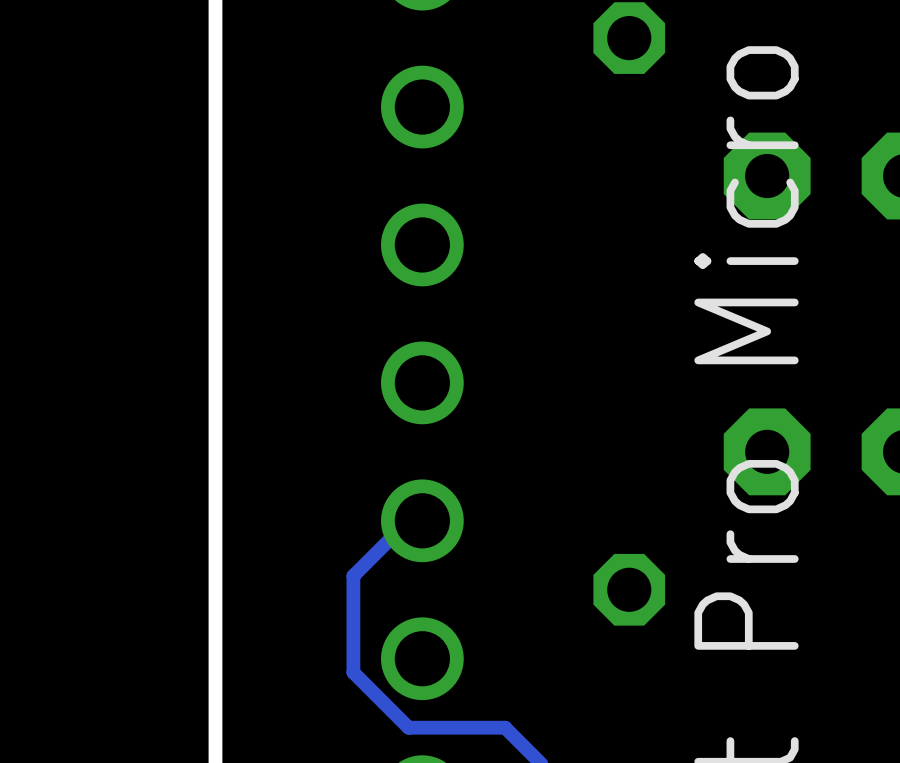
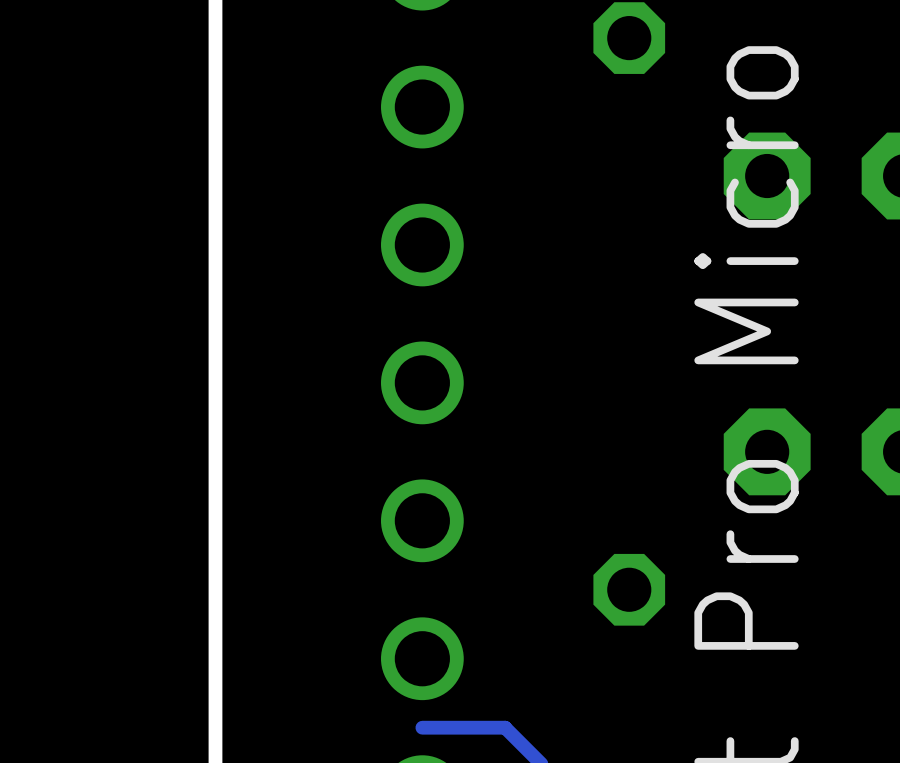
track: (422, 520) (408, 520) (353, 575) (353, 672) (408, 727) (422, 727) -> none

